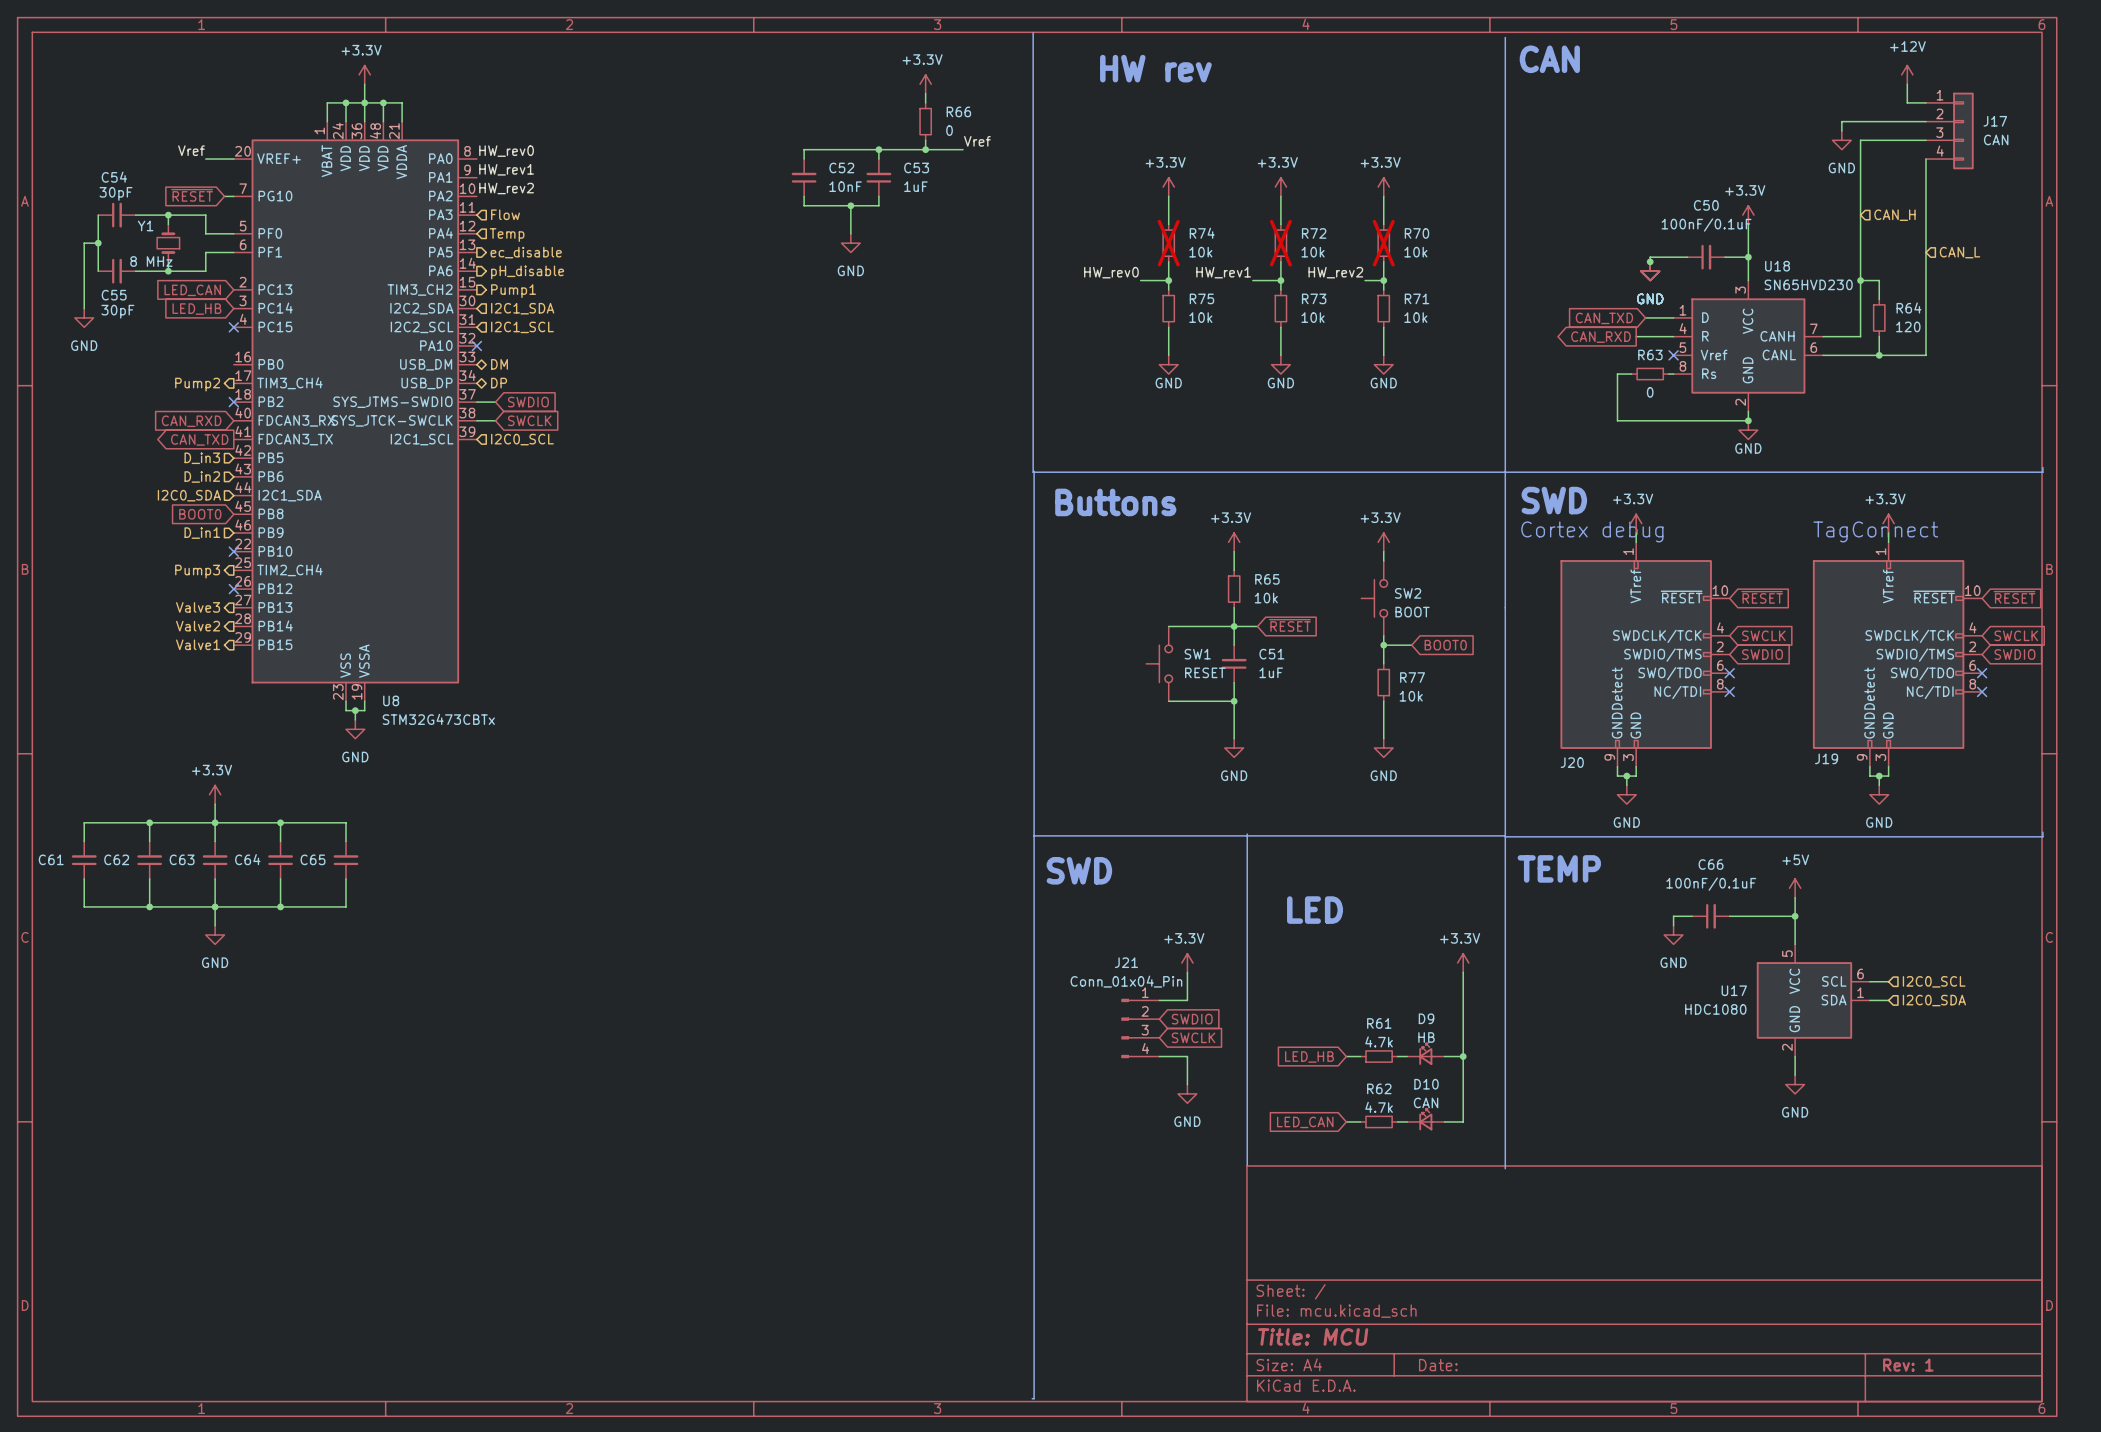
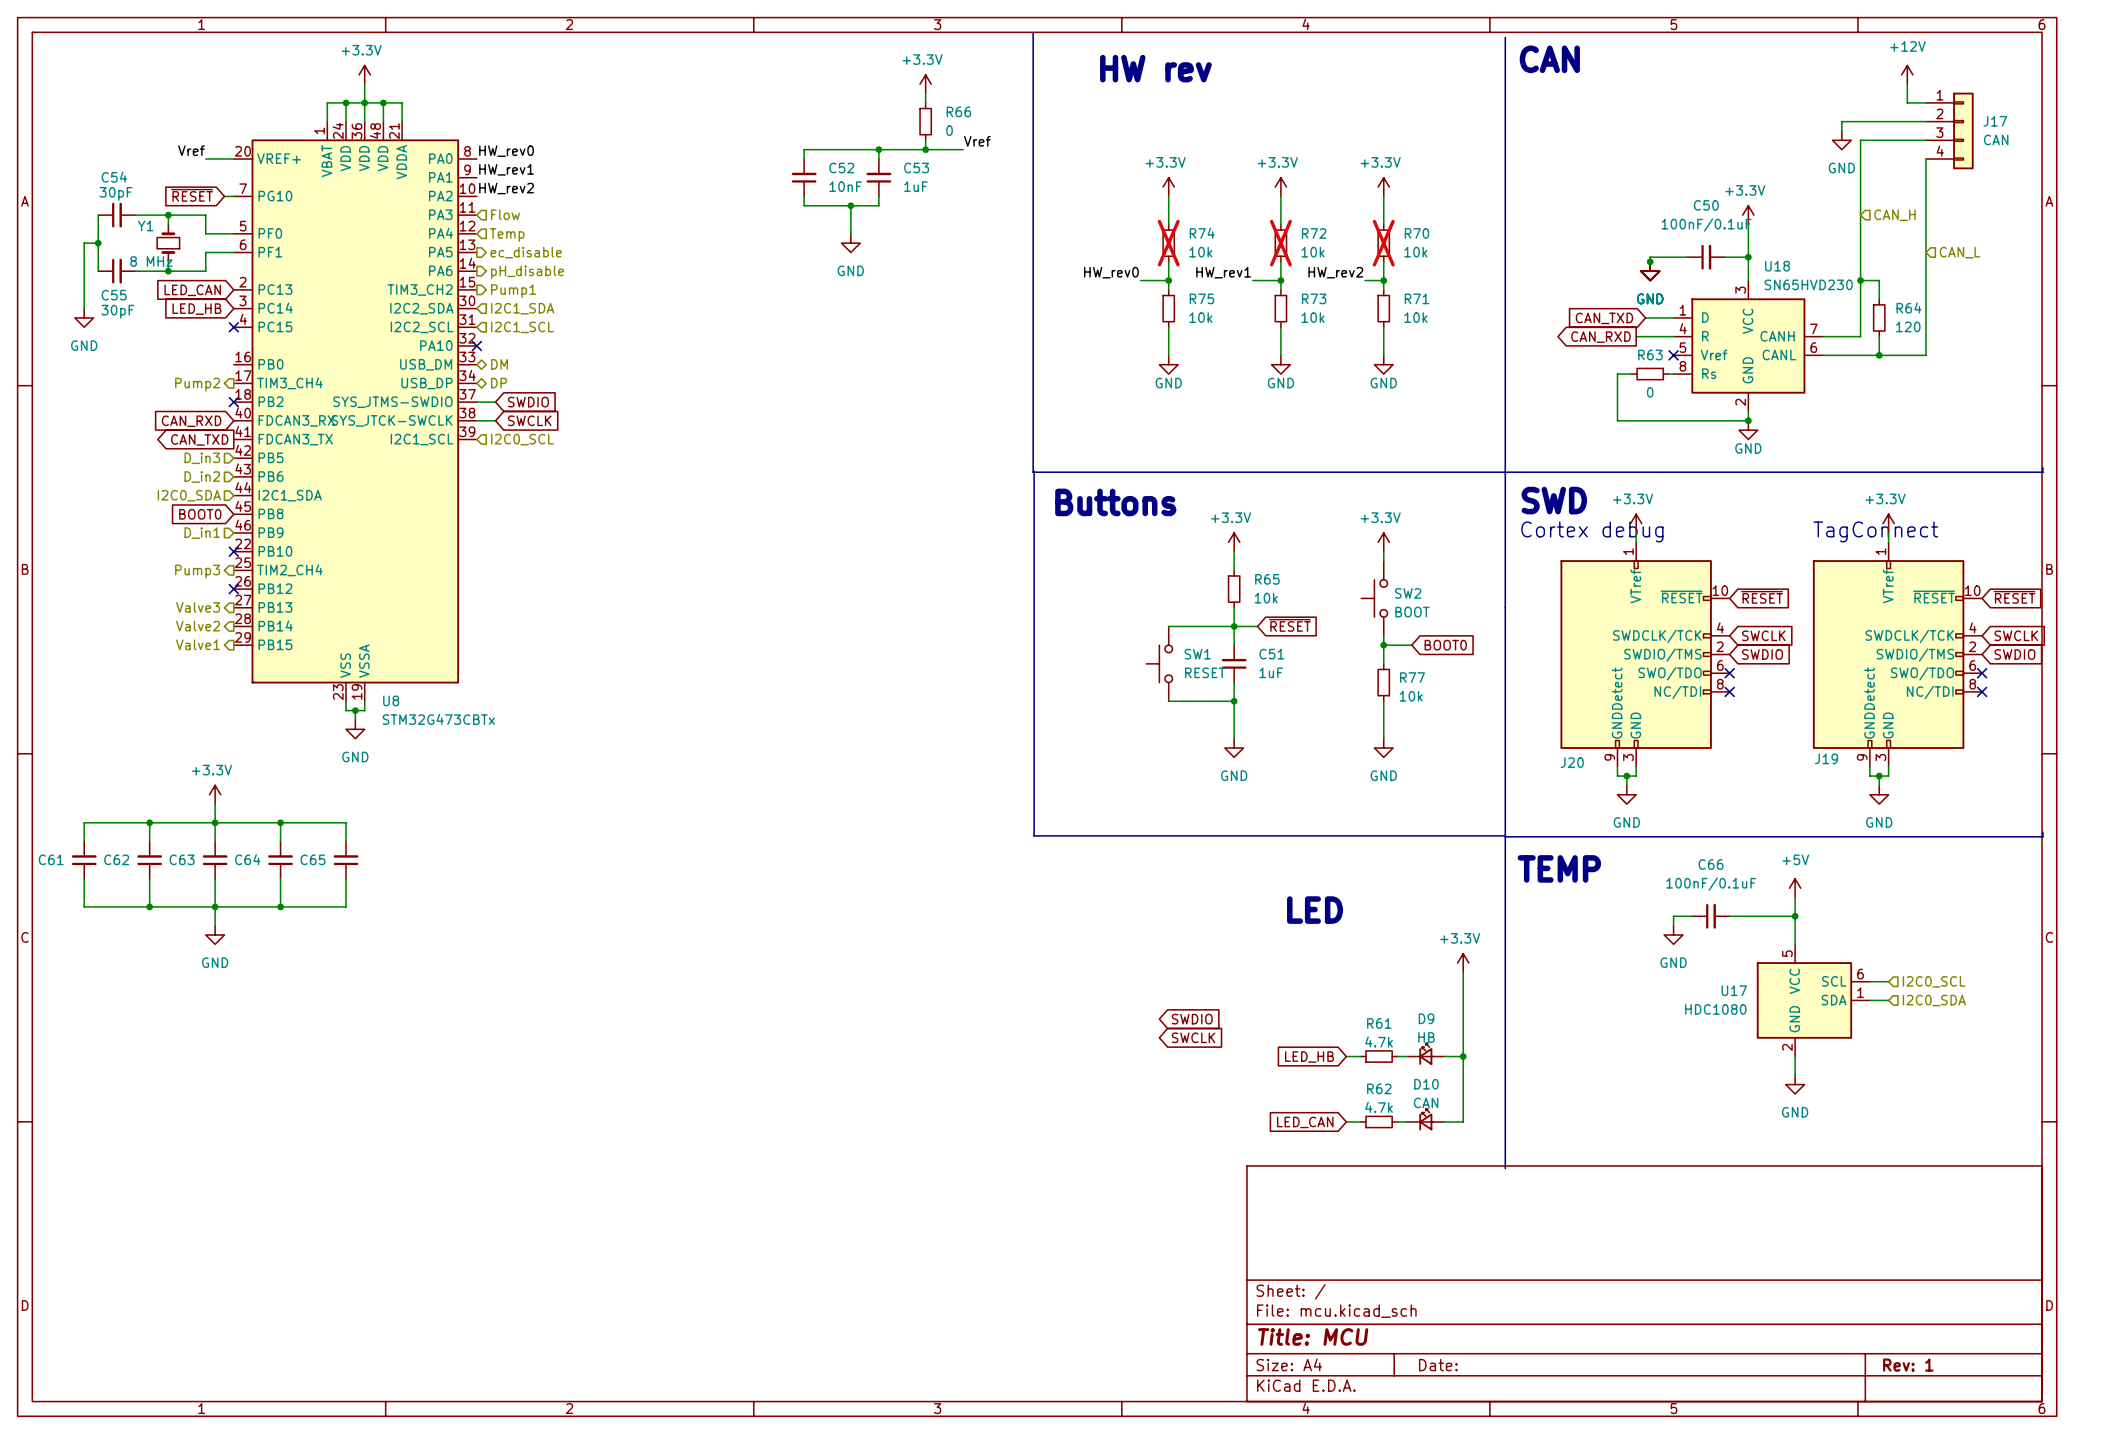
line: (1247, 834) (1247, 1164) -> none
line: (1034, 835) (1034, 1398) (1032, 1398) -> none
text: SWD (1079, 870) -> none
power symbol: +3.3V (1187, 963) -> none
wire: (1187, 972) (1187, 1000) (1159, 1000) -> none
J21: Conn_01x04_Pin (1140, 1028) -> none
wire: (1159, 1056) (1187, 1056) (1187, 1084) -> none
power symbol: GND (1187, 1093) -> none

